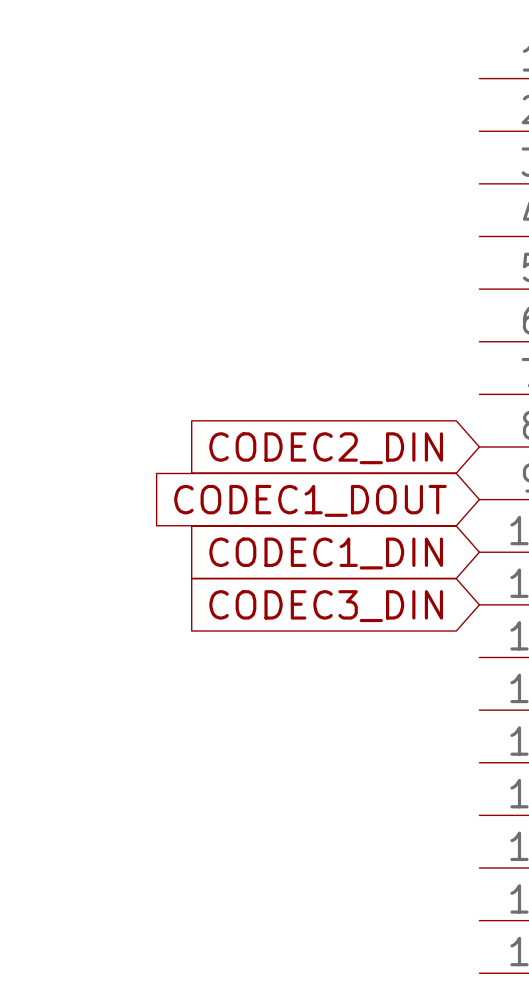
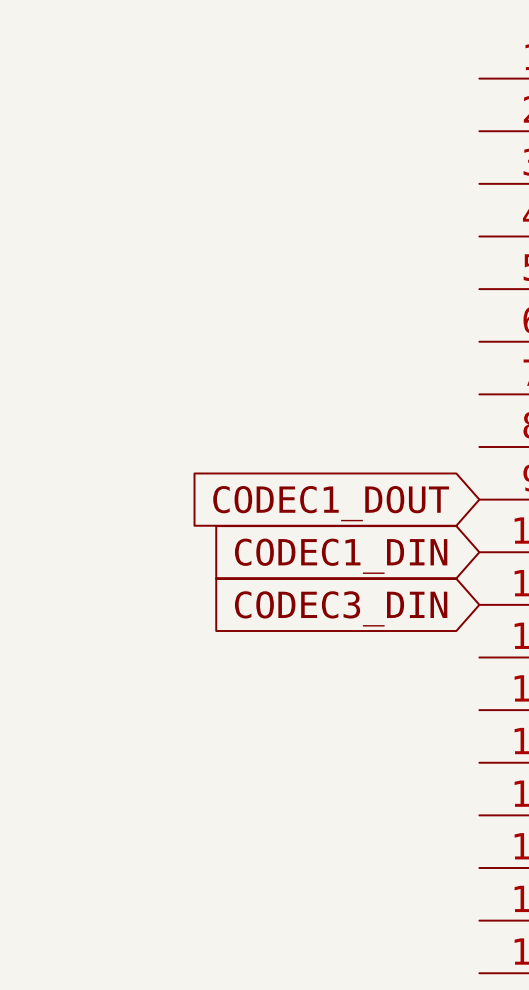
global label: CODEC2_DIN (326, 448) -> none

